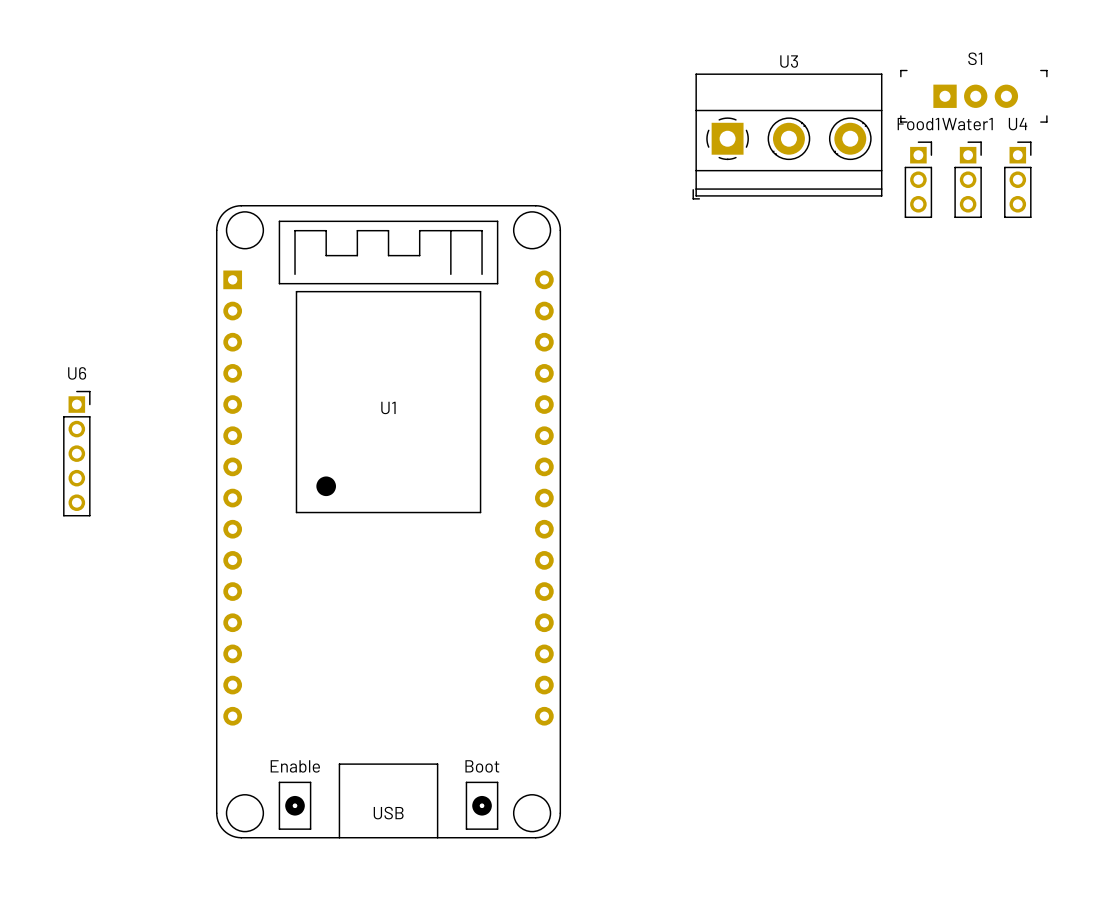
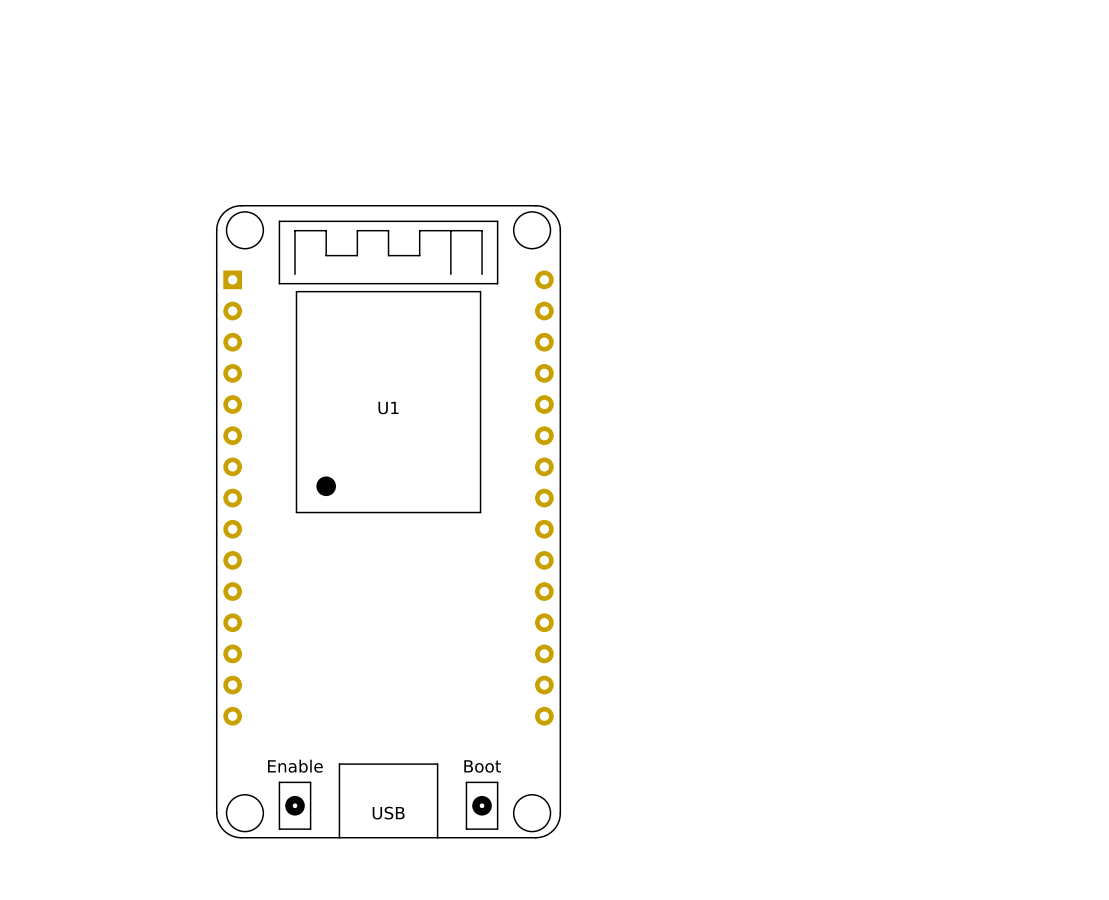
S1: (973, 96) -> none
U3: (787, 136) -> none
Food1: (918, 179) -> none
Water1: (968, 179) -> none
U4: (1017, 179) -> none
U6: (76, 453) -> none

